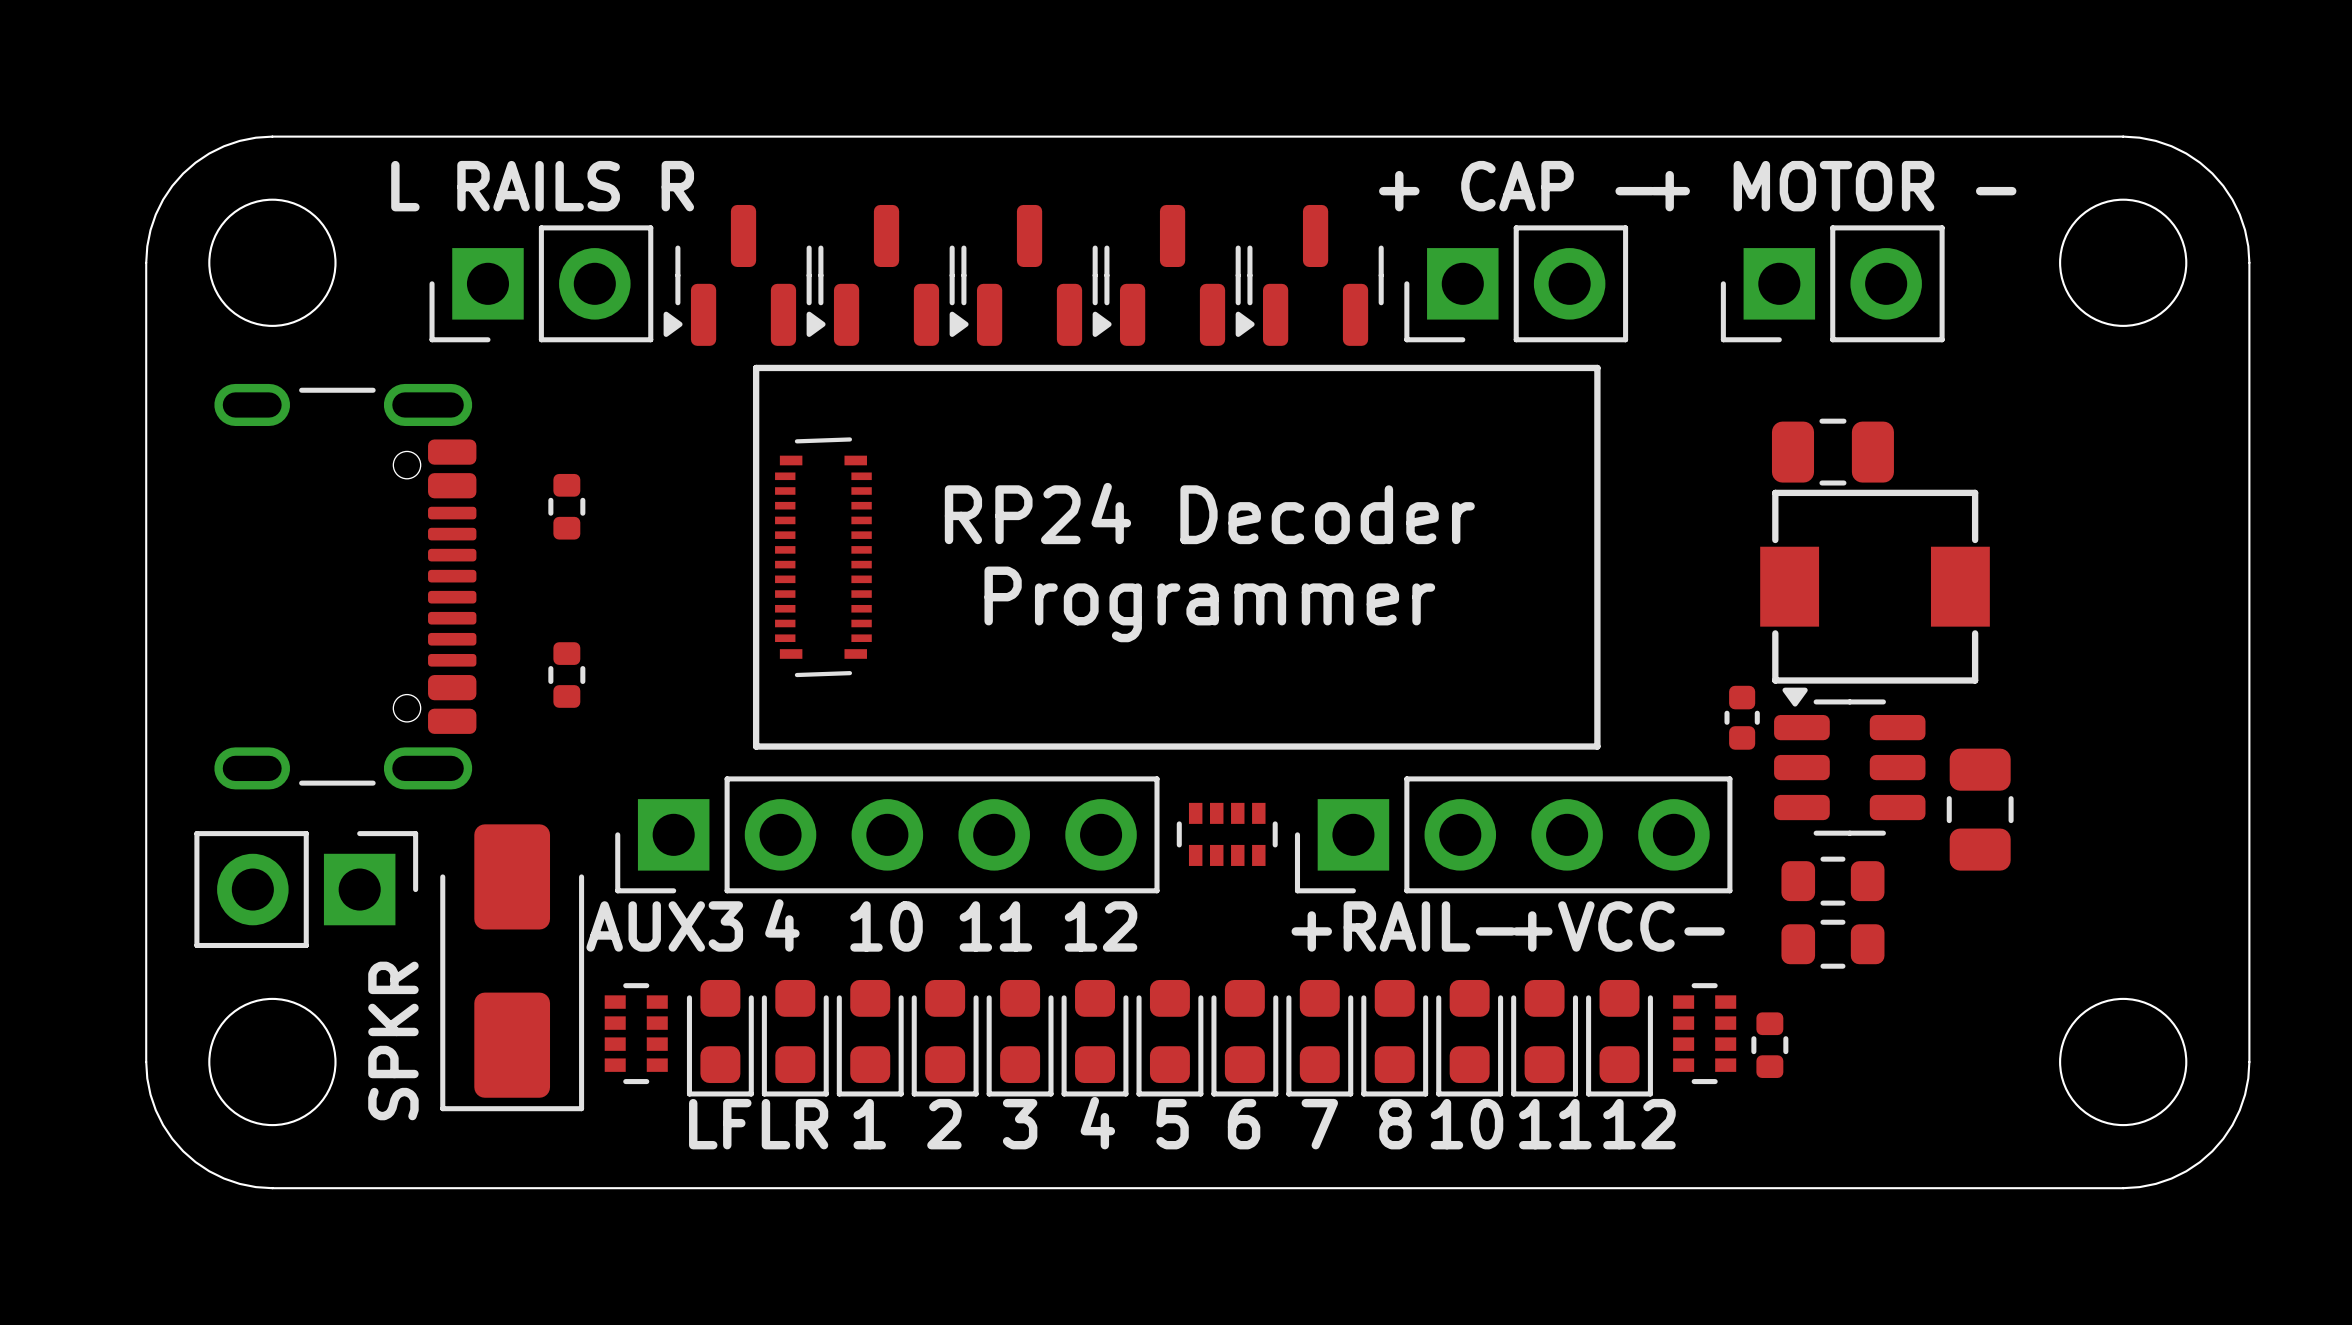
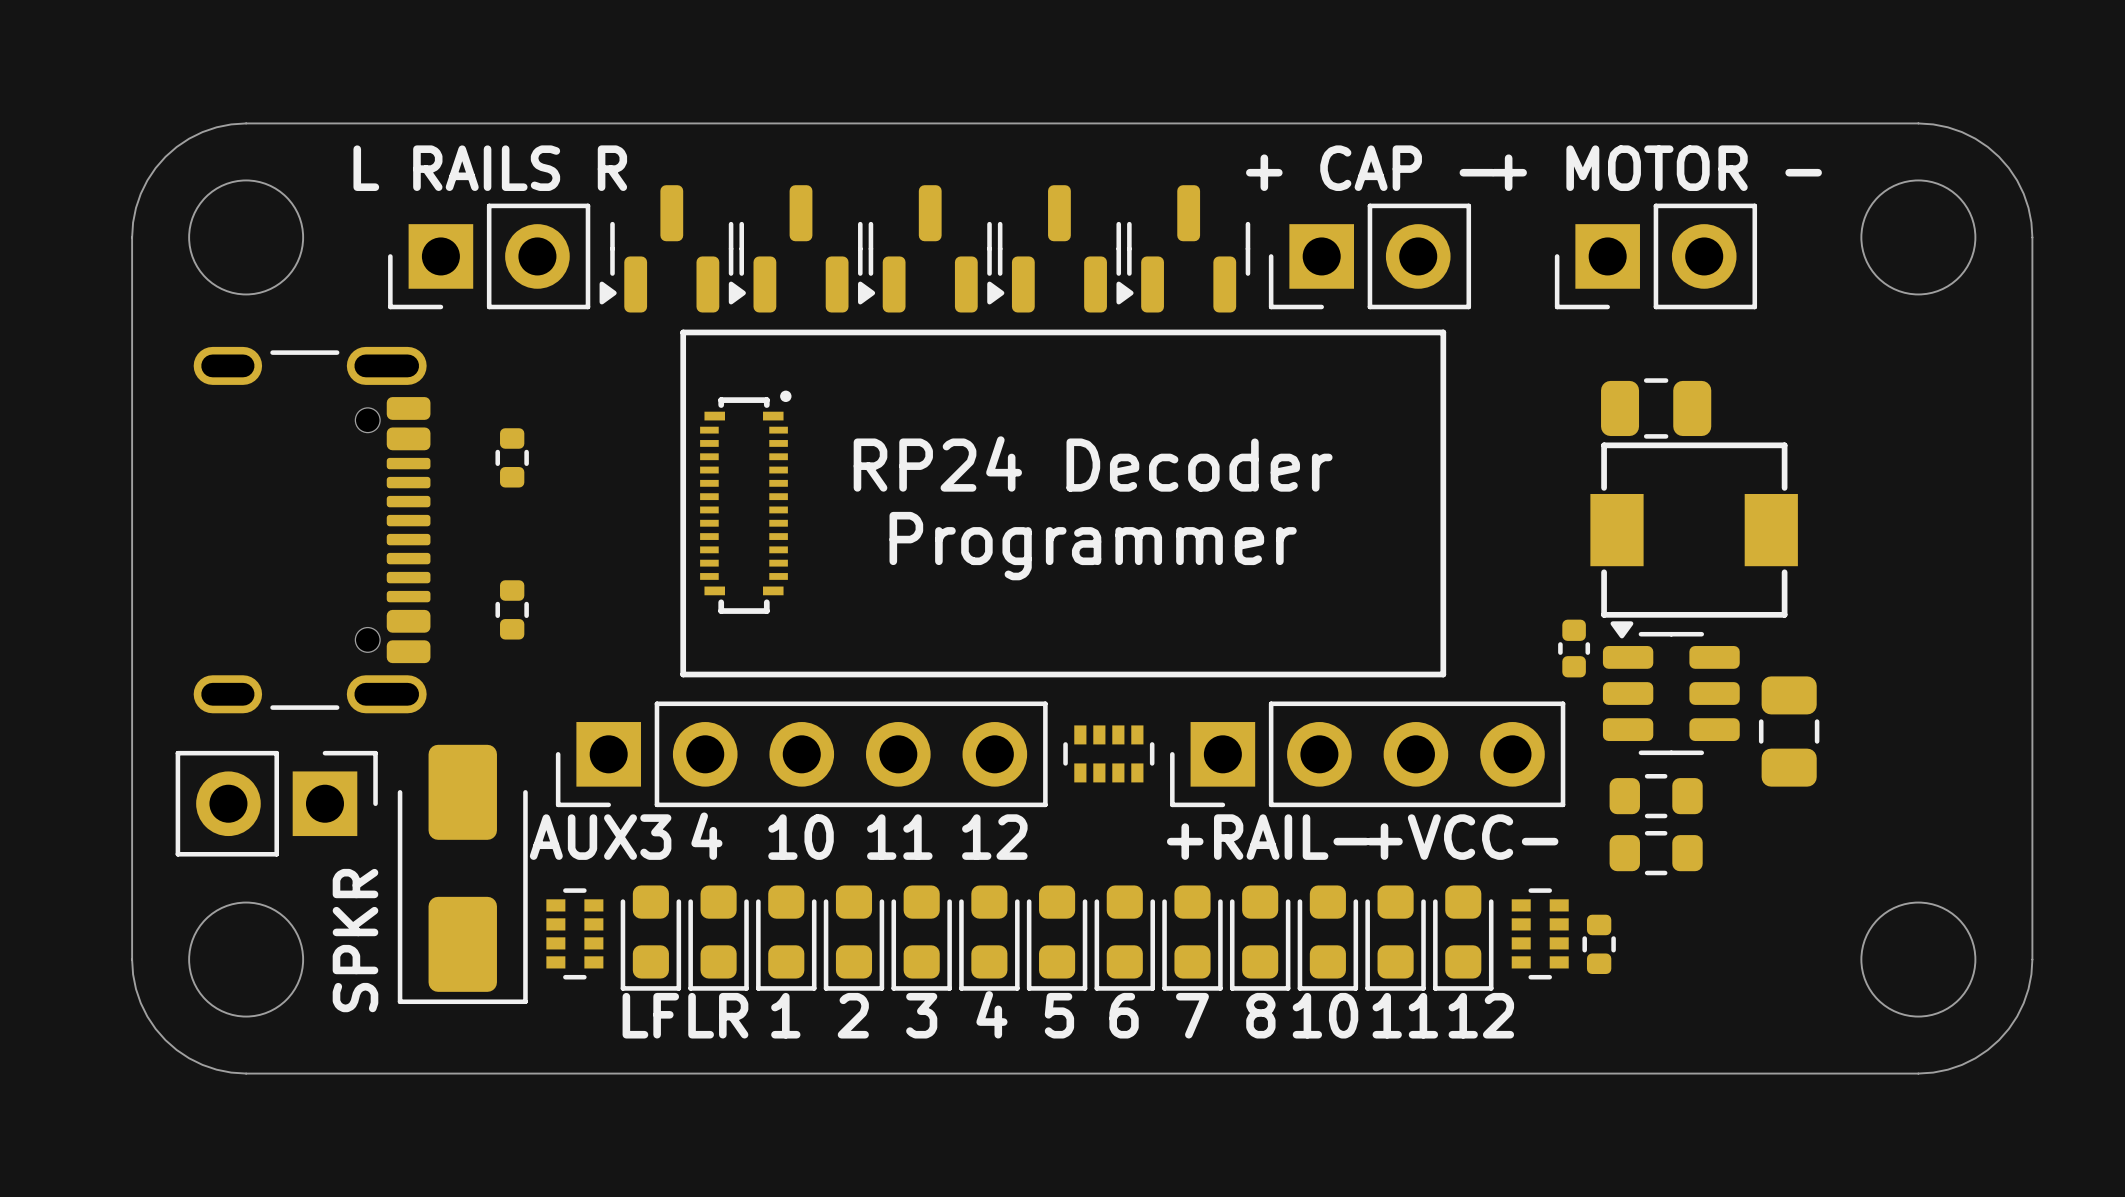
part footprint: [775, 437, 872, 678] -> [700, 390, 792, 614]

